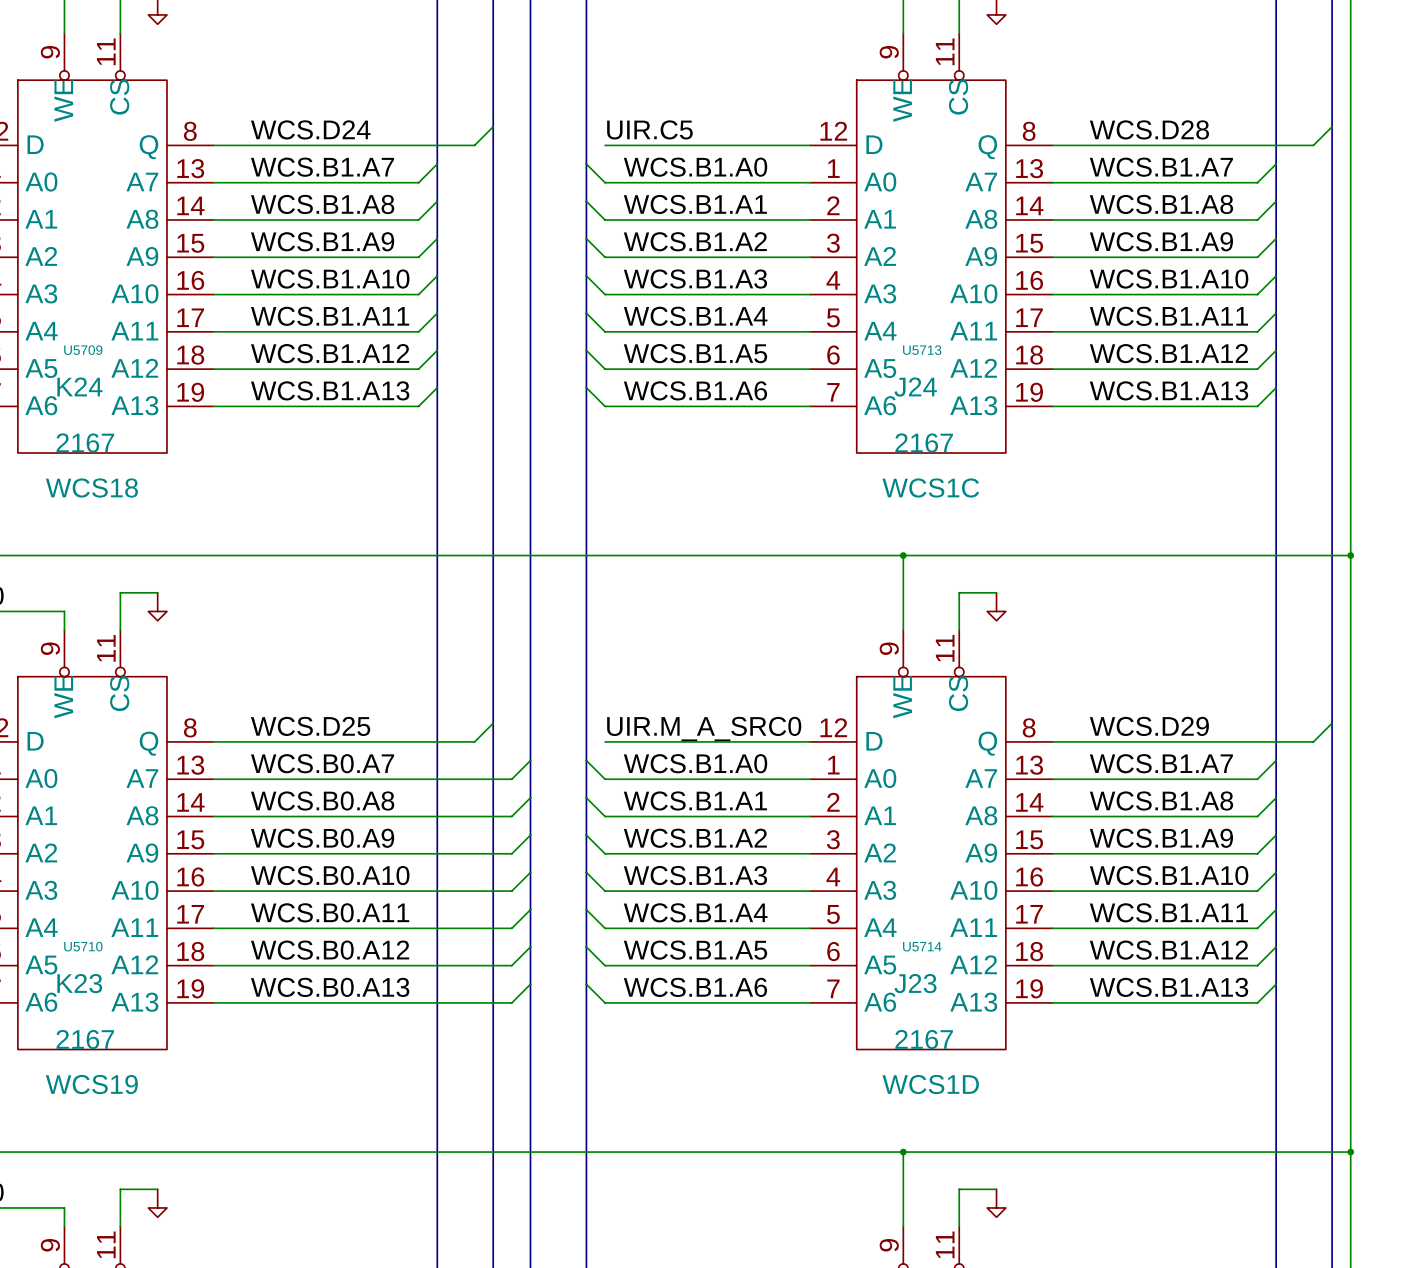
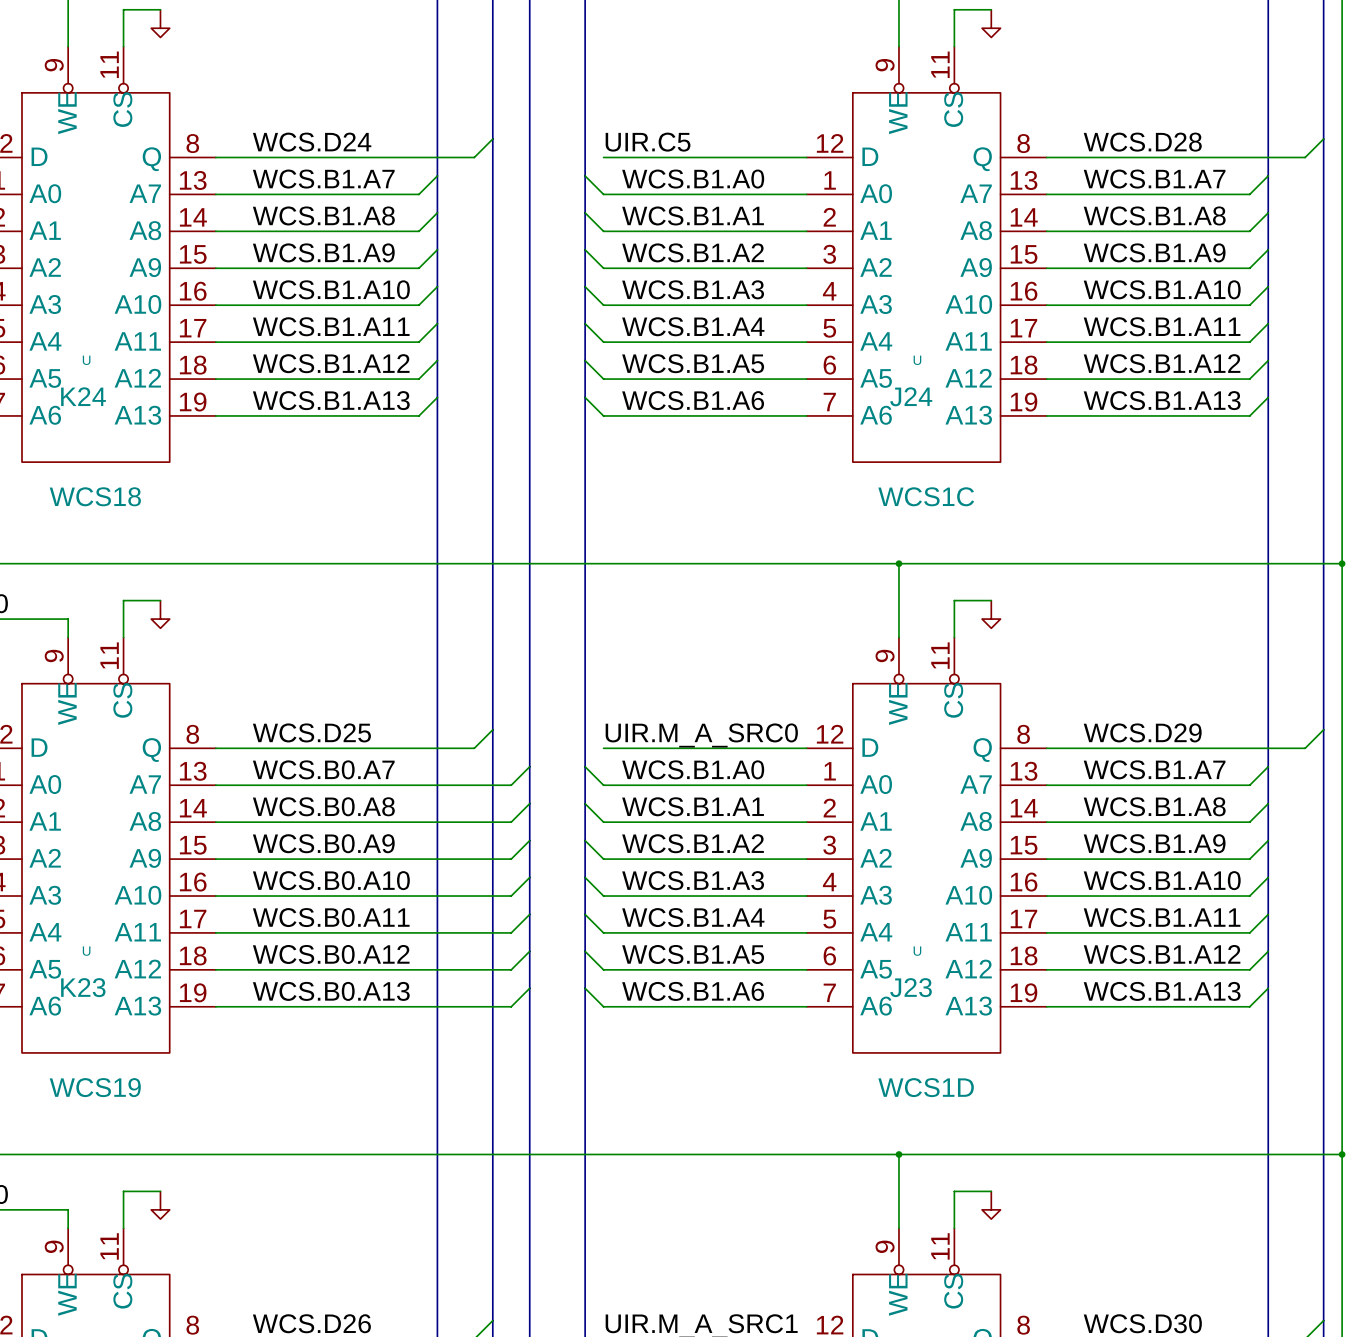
U5709 name: U5709 (83, 350) -> U (86, 360)
U5713 name: U5713 (922, 350) -> U (917, 360)
U5709 value: 2167 (85, 442) -> none
U5713 value: 2167 (924, 442) -> none
U5710 name: U5710 (83, 946) -> U (86, 951)
U5714 name: U5714 (922, 946) -> U (917, 951)
U5710 value: 2167 (85, 1039) -> none
U5714 value: 2167 (924, 1039) -> none

